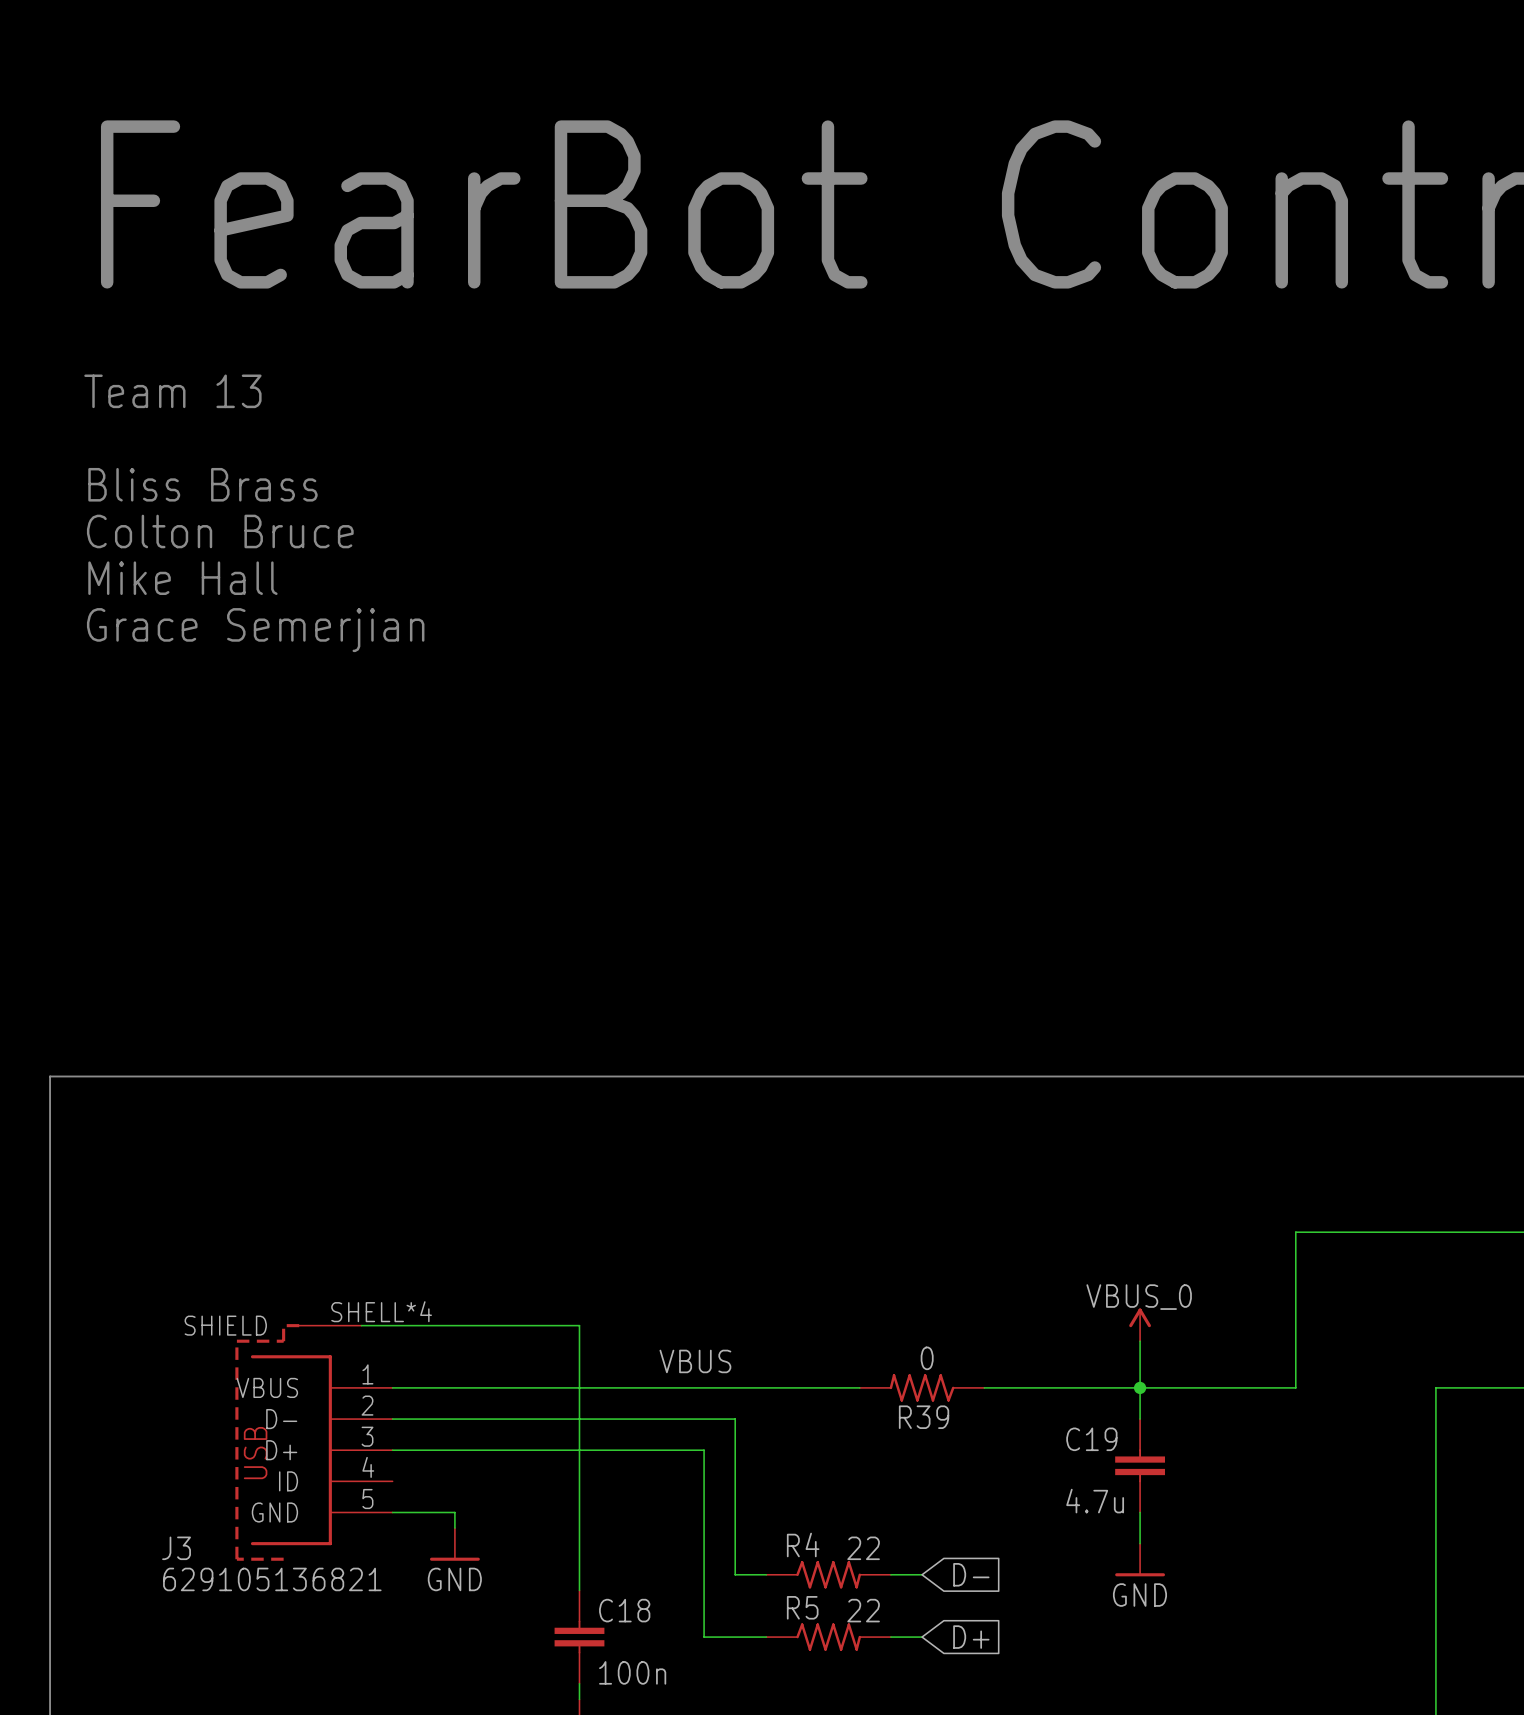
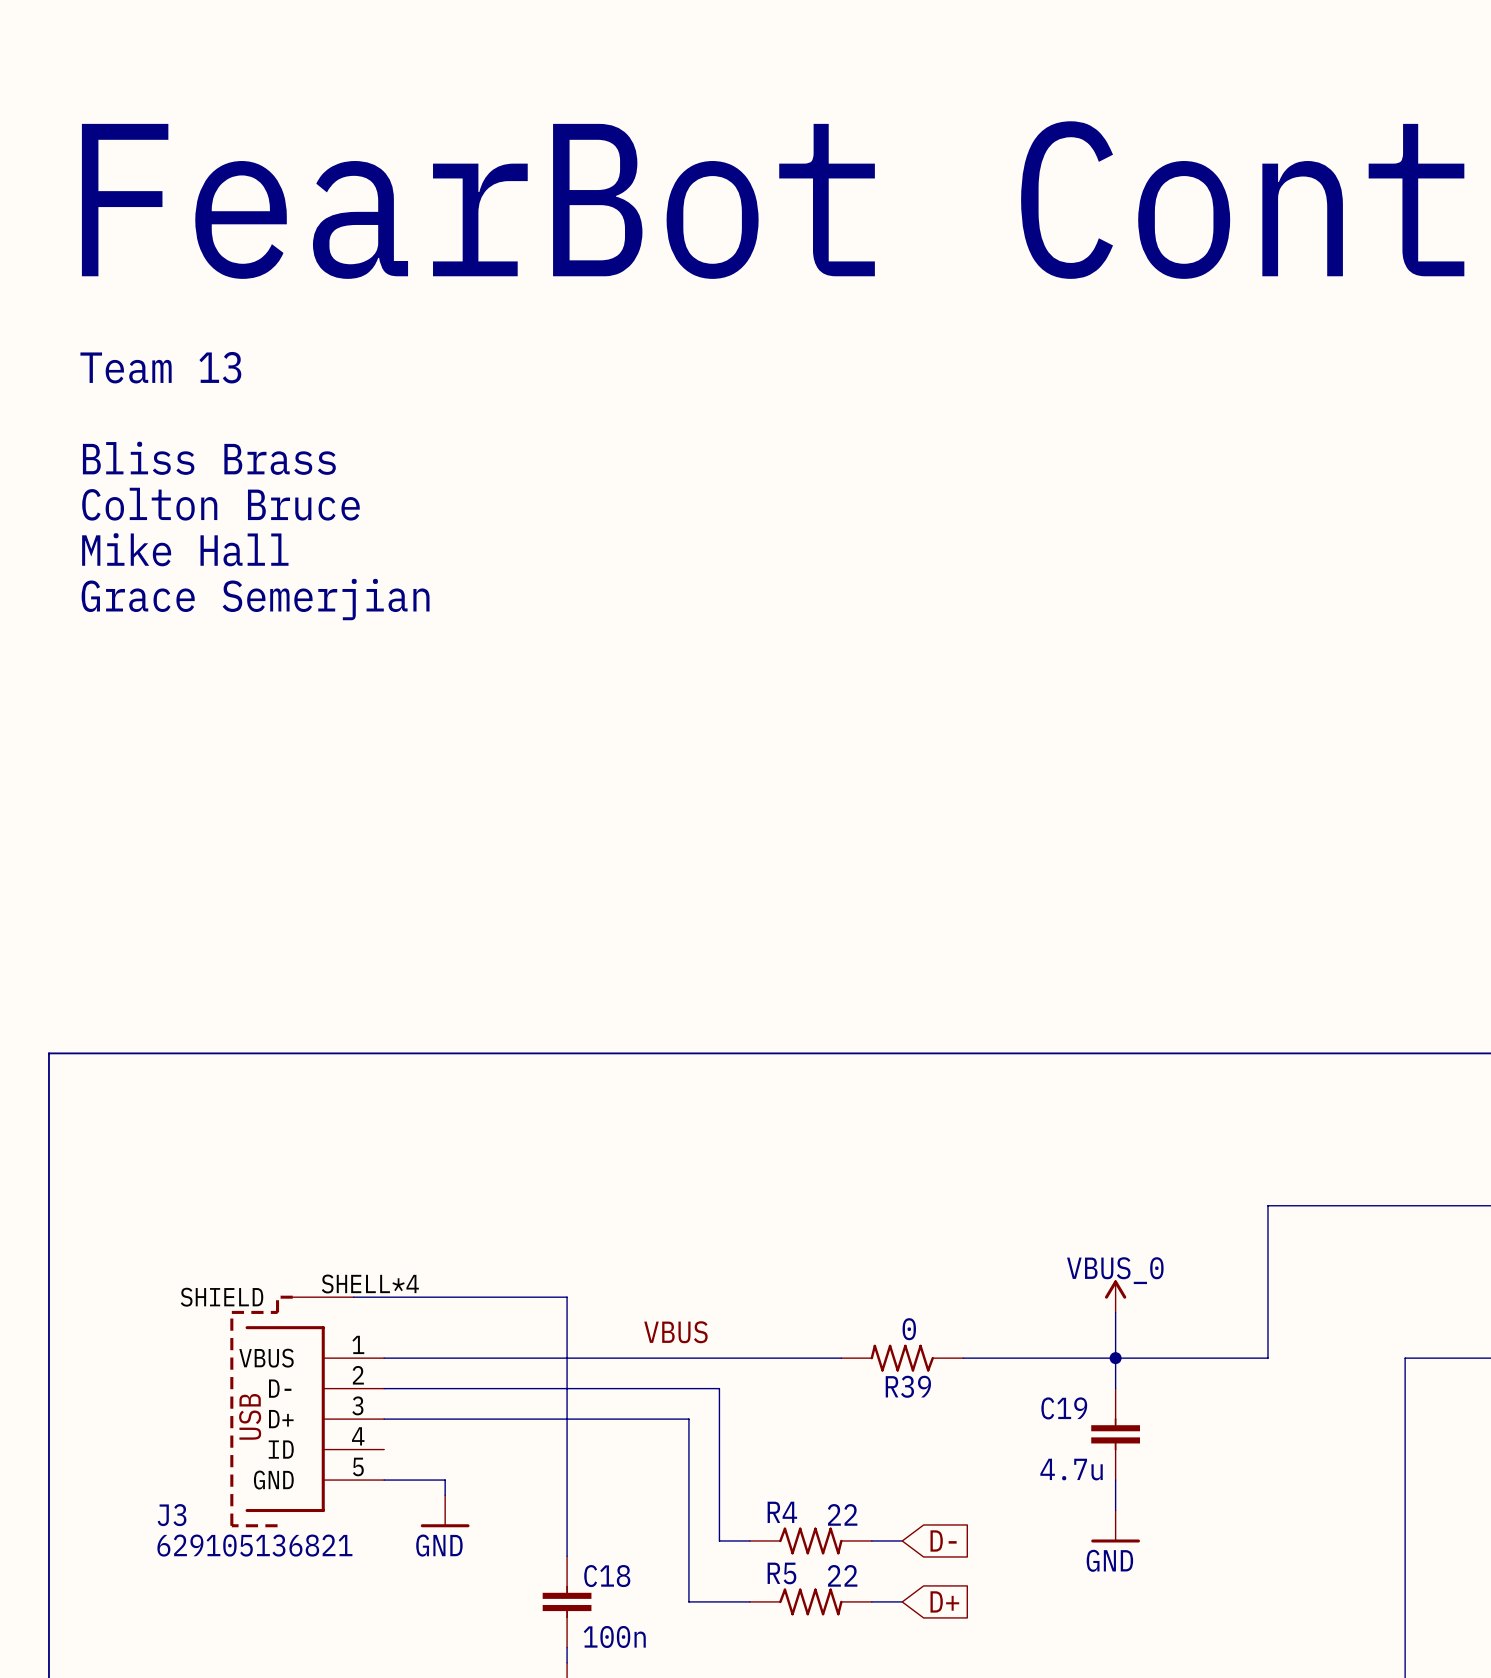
text position: Team 13 (172, 391) -> Team 13 (160, 367)
text position: Bliss Brass (202, 484) -> Bliss Brass (209, 458)
text position: Colton Bruce (220, 531) -> Colton Bruce (220, 504)
text position: Mike Hall (182, 578) -> Mike Hall (185, 549)
text position: Grace Semerjian (255, 630) -> Grace Semerjian (255, 599)

